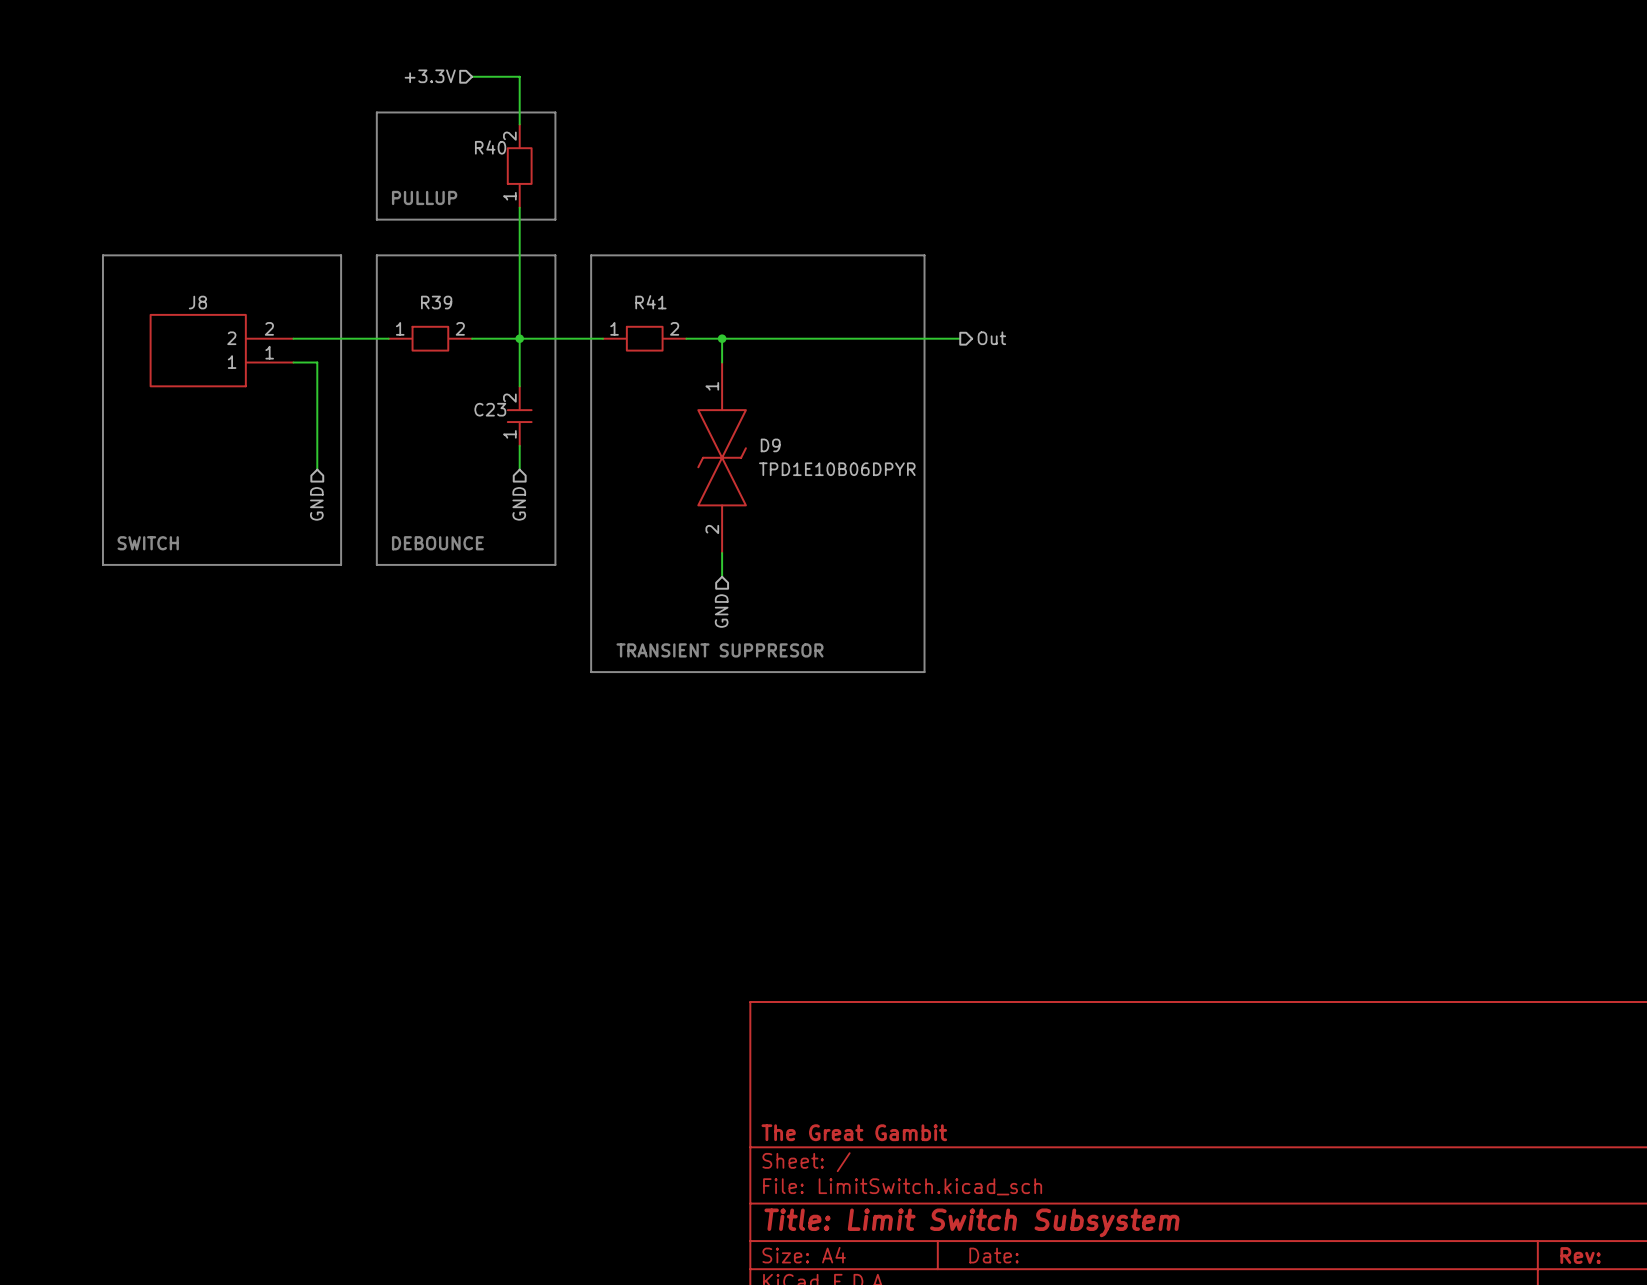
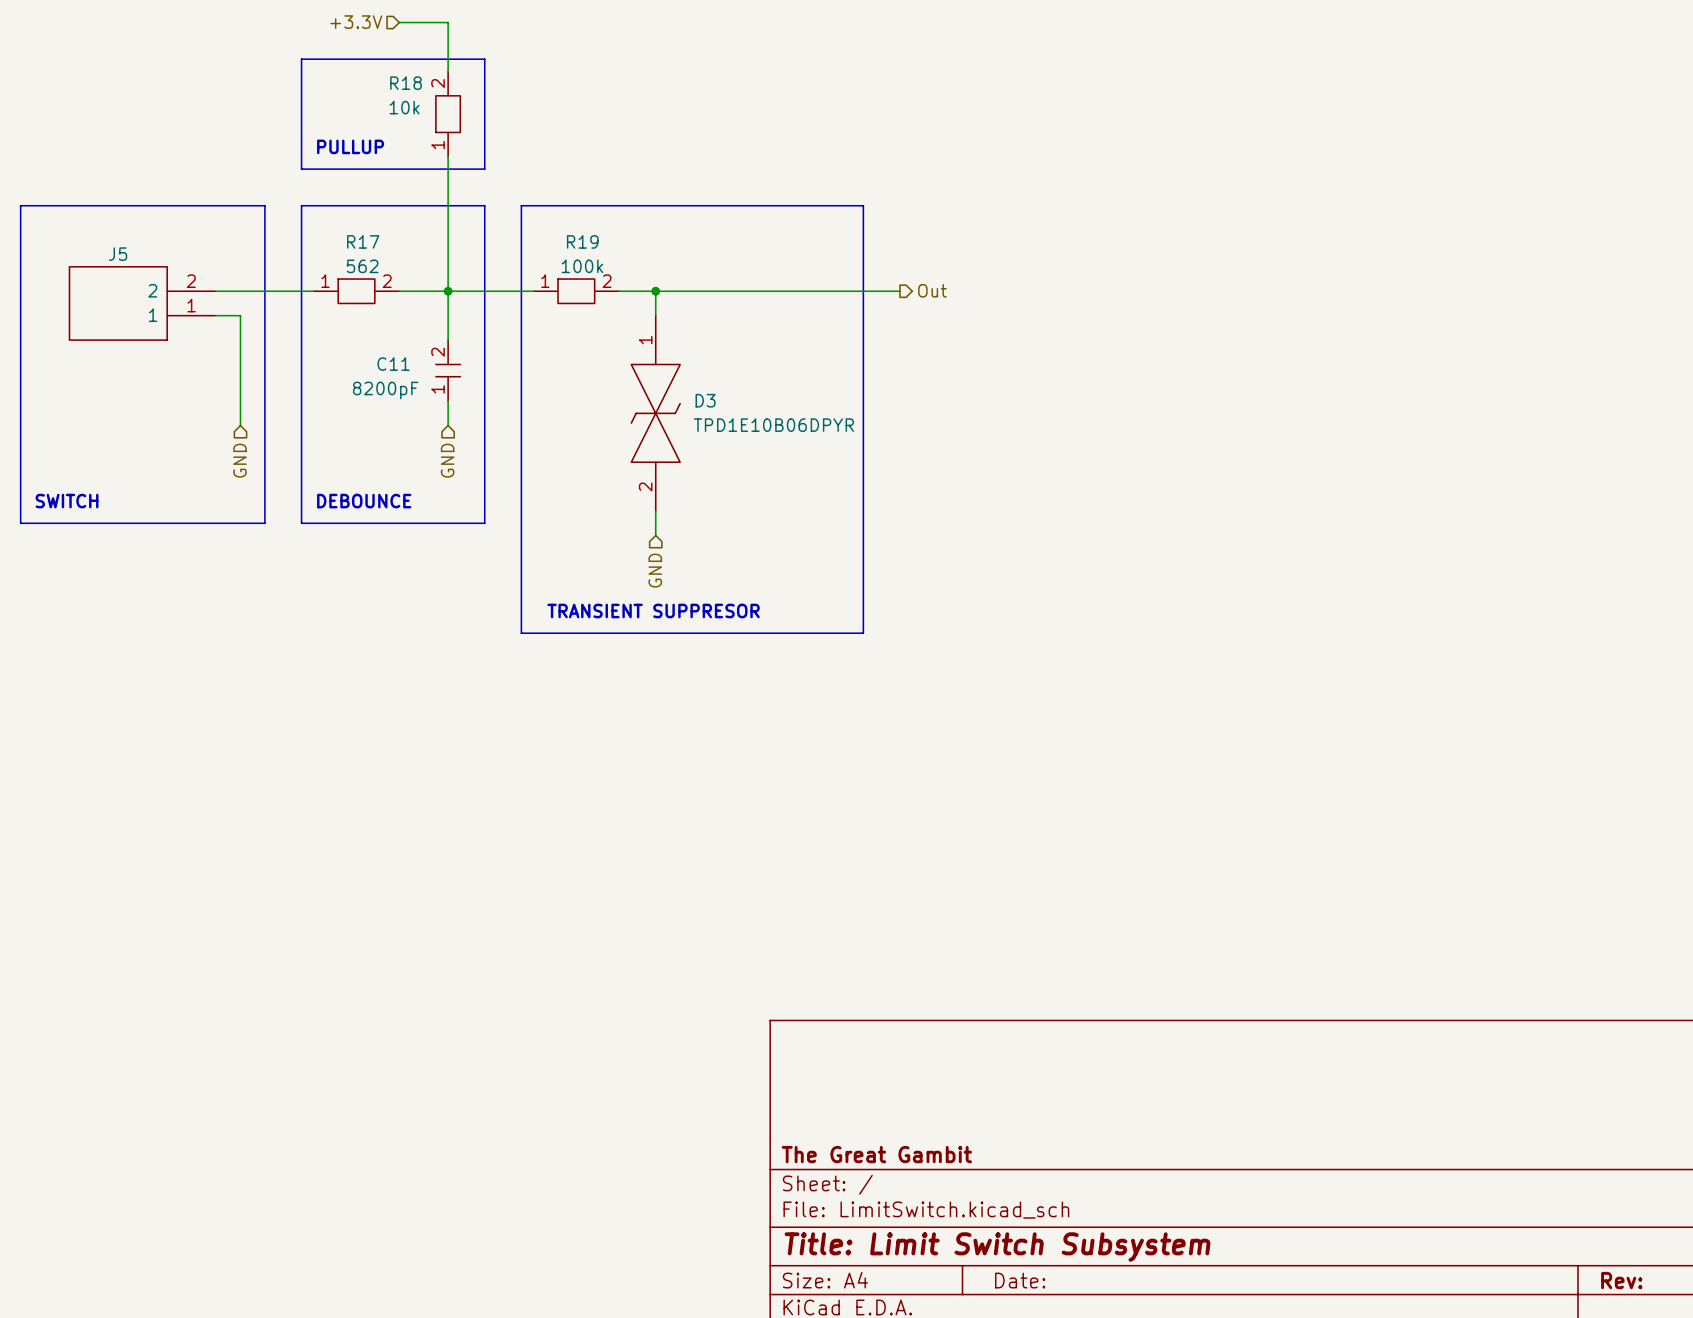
hierarchical label position: +3.3V (430, 76) -> +3.3V (356, 22)
wire: (472, 76) (519, 76) (519, 124) -> (399, 22) (448, 22) (448, 71)
line: (376, 112) (376, 219) (555, 219) (555, 112) (376, 112) -> (301, 59) (301, 169) (484, 169) (484, 59) (301, 59)
R18: none -> 10k (448, 114)
R40: (519, 166) -> none
text position: PULLUP (424, 197) -> PULLUP (350, 146)
wire: (519, 207) (519, 386) -> (448, 156) (448, 340)
line: (102, 255) (341, 255) (341, 564) (102, 564) (102, 255) -> (20, 205) (264, 205) (264, 523) (20, 523) (20, 205)
line: (376, 255) (555, 255) (555, 564) (376, 564) (376, 255) -> (301, 205) (484, 205) (484, 523) (301, 523) (301, 205)
line: (591, 255) (924, 255) (924, 672) (591, 672) (591, 255) -> (521, 205) (863, 205) (863, 633) (521, 633) (521, 205)
R17: none -> 562 (356, 291)
junction: none -> (448, 291)
R19: none -> 100k (576, 291)
junction: none -> (655, 291)
J5: none -> (142, 303)
wire: (293, 338) (388, 338) -> (216, 291) (313, 291)
R39: (430, 338) -> none
wire: (472, 338) (603, 338) -> (399, 291) (533, 291)
junction: (519, 338) -> none
R41: (644, 338) -> none
wire: (686, 338) (960, 338) -> (619, 291) (900, 291)
wire: (722, 338) (722, 362) -> (655, 291) (655, 315)
junction: (722, 338) -> none
hierarchical label position: Out (991, 338) -> Out (932, 290)
J8: (221, 350) -> none
wire: (293, 362) (317, 362) (317, 469) -> (216, 315) (240, 315) (240, 425)
C11: none -> 8200pF (448, 370)
D3: none -> TPD1E10B06DPYR (655, 413)
C23: (519, 416) -> none
wire: (519, 445) (519, 469) -> (448, 401) (448, 425)
hierarchical label: none -> GND (240, 460)
hierarchical label: none -> GND (447, 460)
D9: TPD1E10B06DPYR (722, 457) -> none
hierarchical label: GND (316, 503) -> none
hierarchical label: GND (519, 503) -> none
text position: SWITCH (148, 543) -> SWITCH (67, 501)
text position: DEBOUNCE (437, 543) -> DEBOUNCE (364, 501)
wire: (722, 553) (722, 576) -> (655, 511) (655, 535)
hierarchical label: none -> GND (655, 570)
hierarchical label: GND (721, 611) -> none
text position: TRANSIENT SUPPRESOR (719, 650) -> TRANSIENT SUPPRESOR (653, 610)

